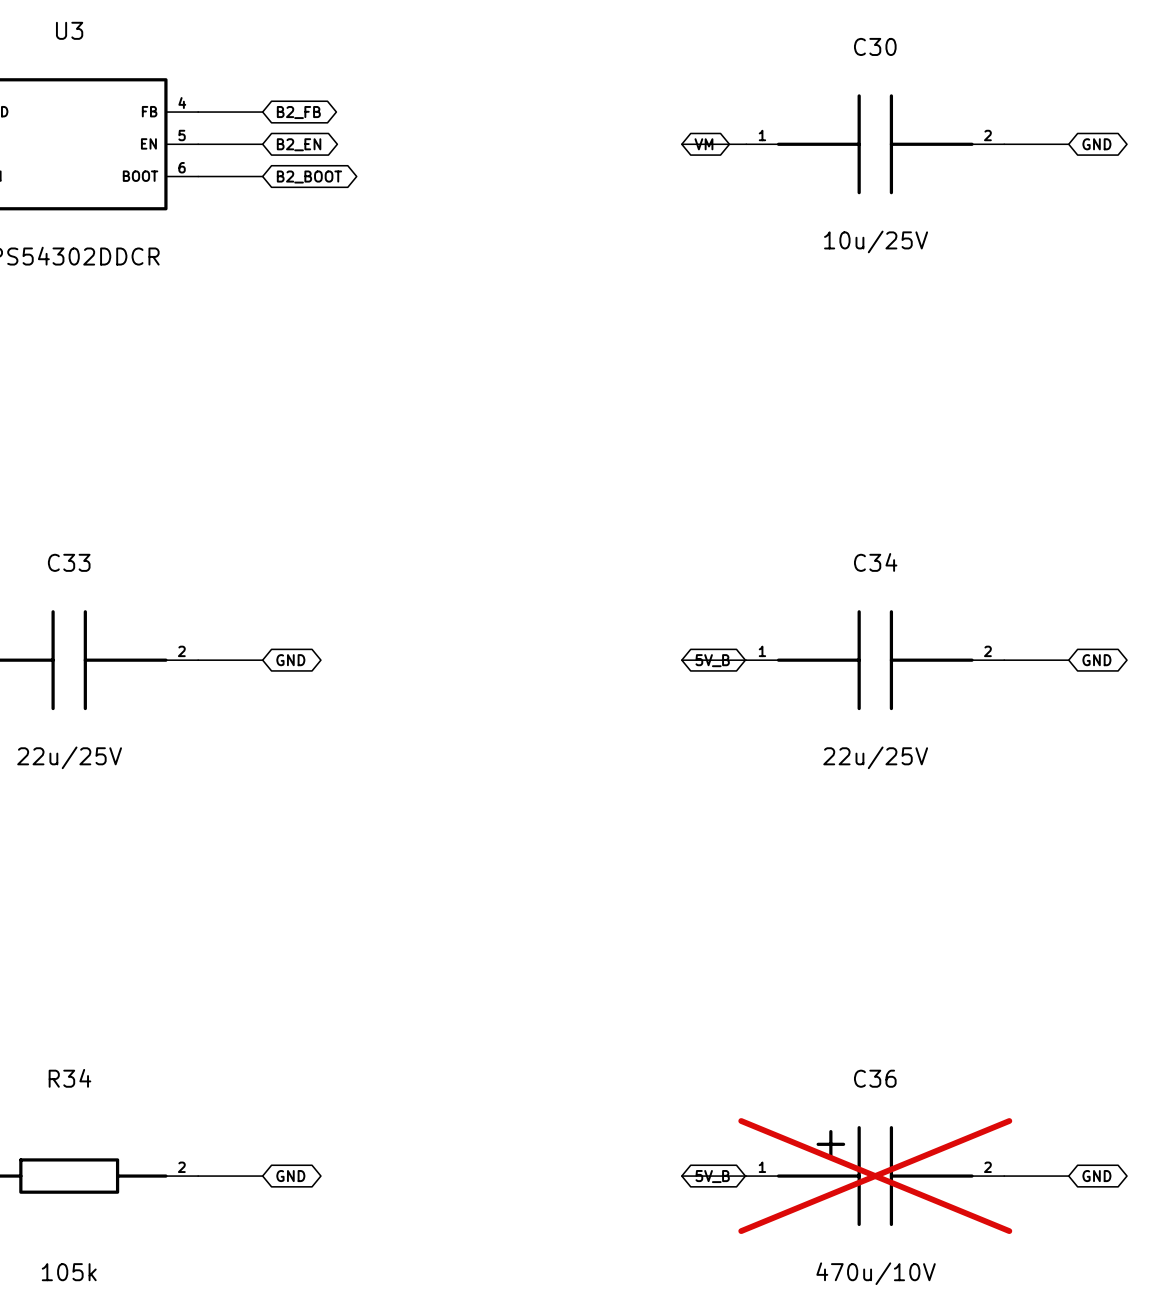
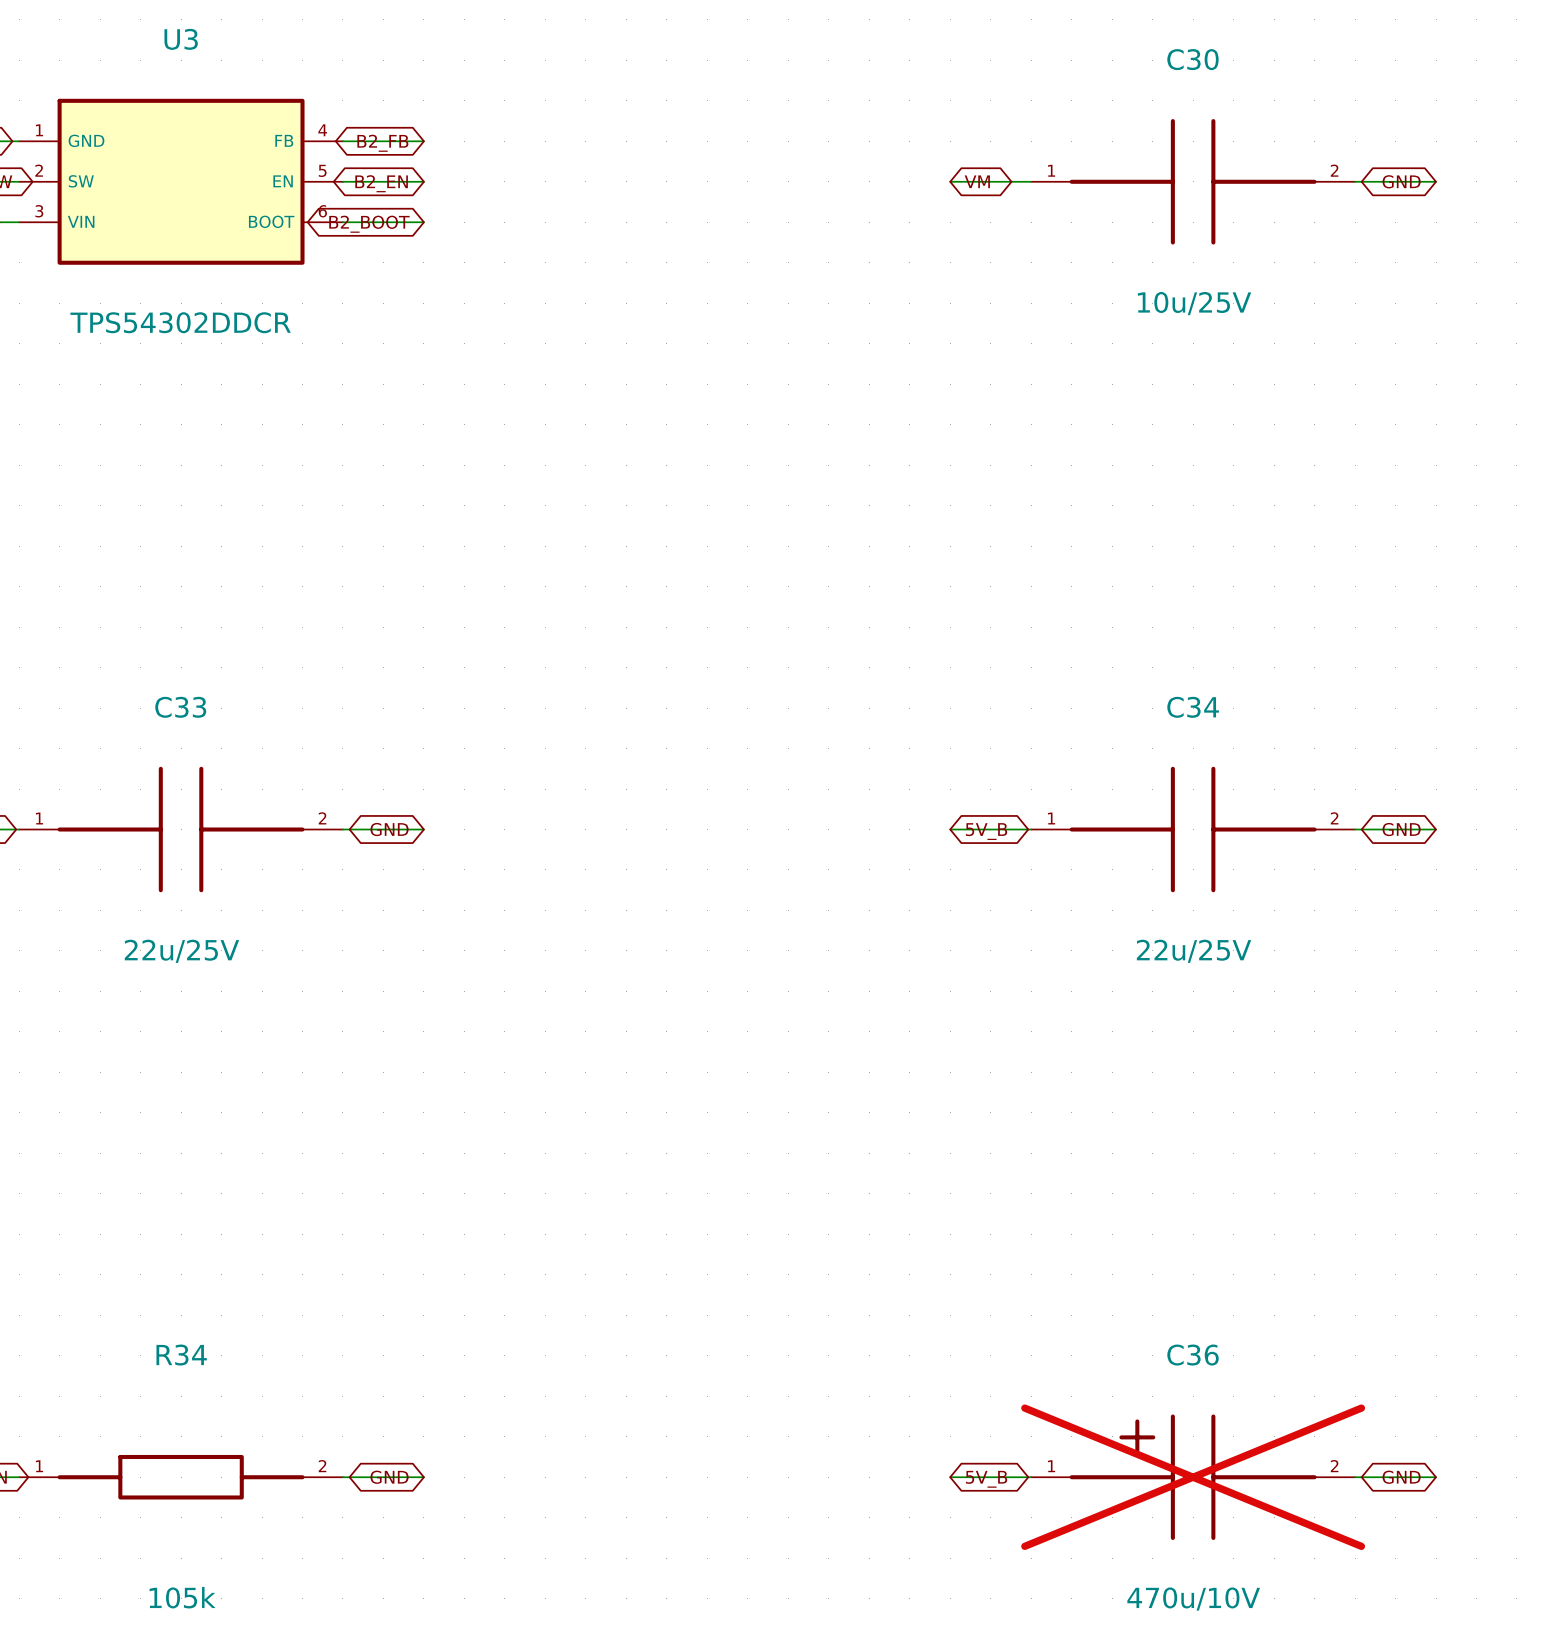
global label rotation: 0° (298, 112) -> 180° (382, 143)
global label rotation: 0° (299, 144) -> 180° (381, 183)
global label rotation: 0° (1096, 144) -> 180° (1401, 181)
global label rotation: 0° (309, 177) -> 180° (369, 224)
global label rotation: 0° (290, 660) -> 180° (389, 829)
global label rotation: 0° (1096, 660) -> 180° (1401, 829)
global label rotation: 0° (290, 1176) -> 180° (389, 1477)
global label rotation: 0° (1096, 1176) -> 180° (1401, 1477)

